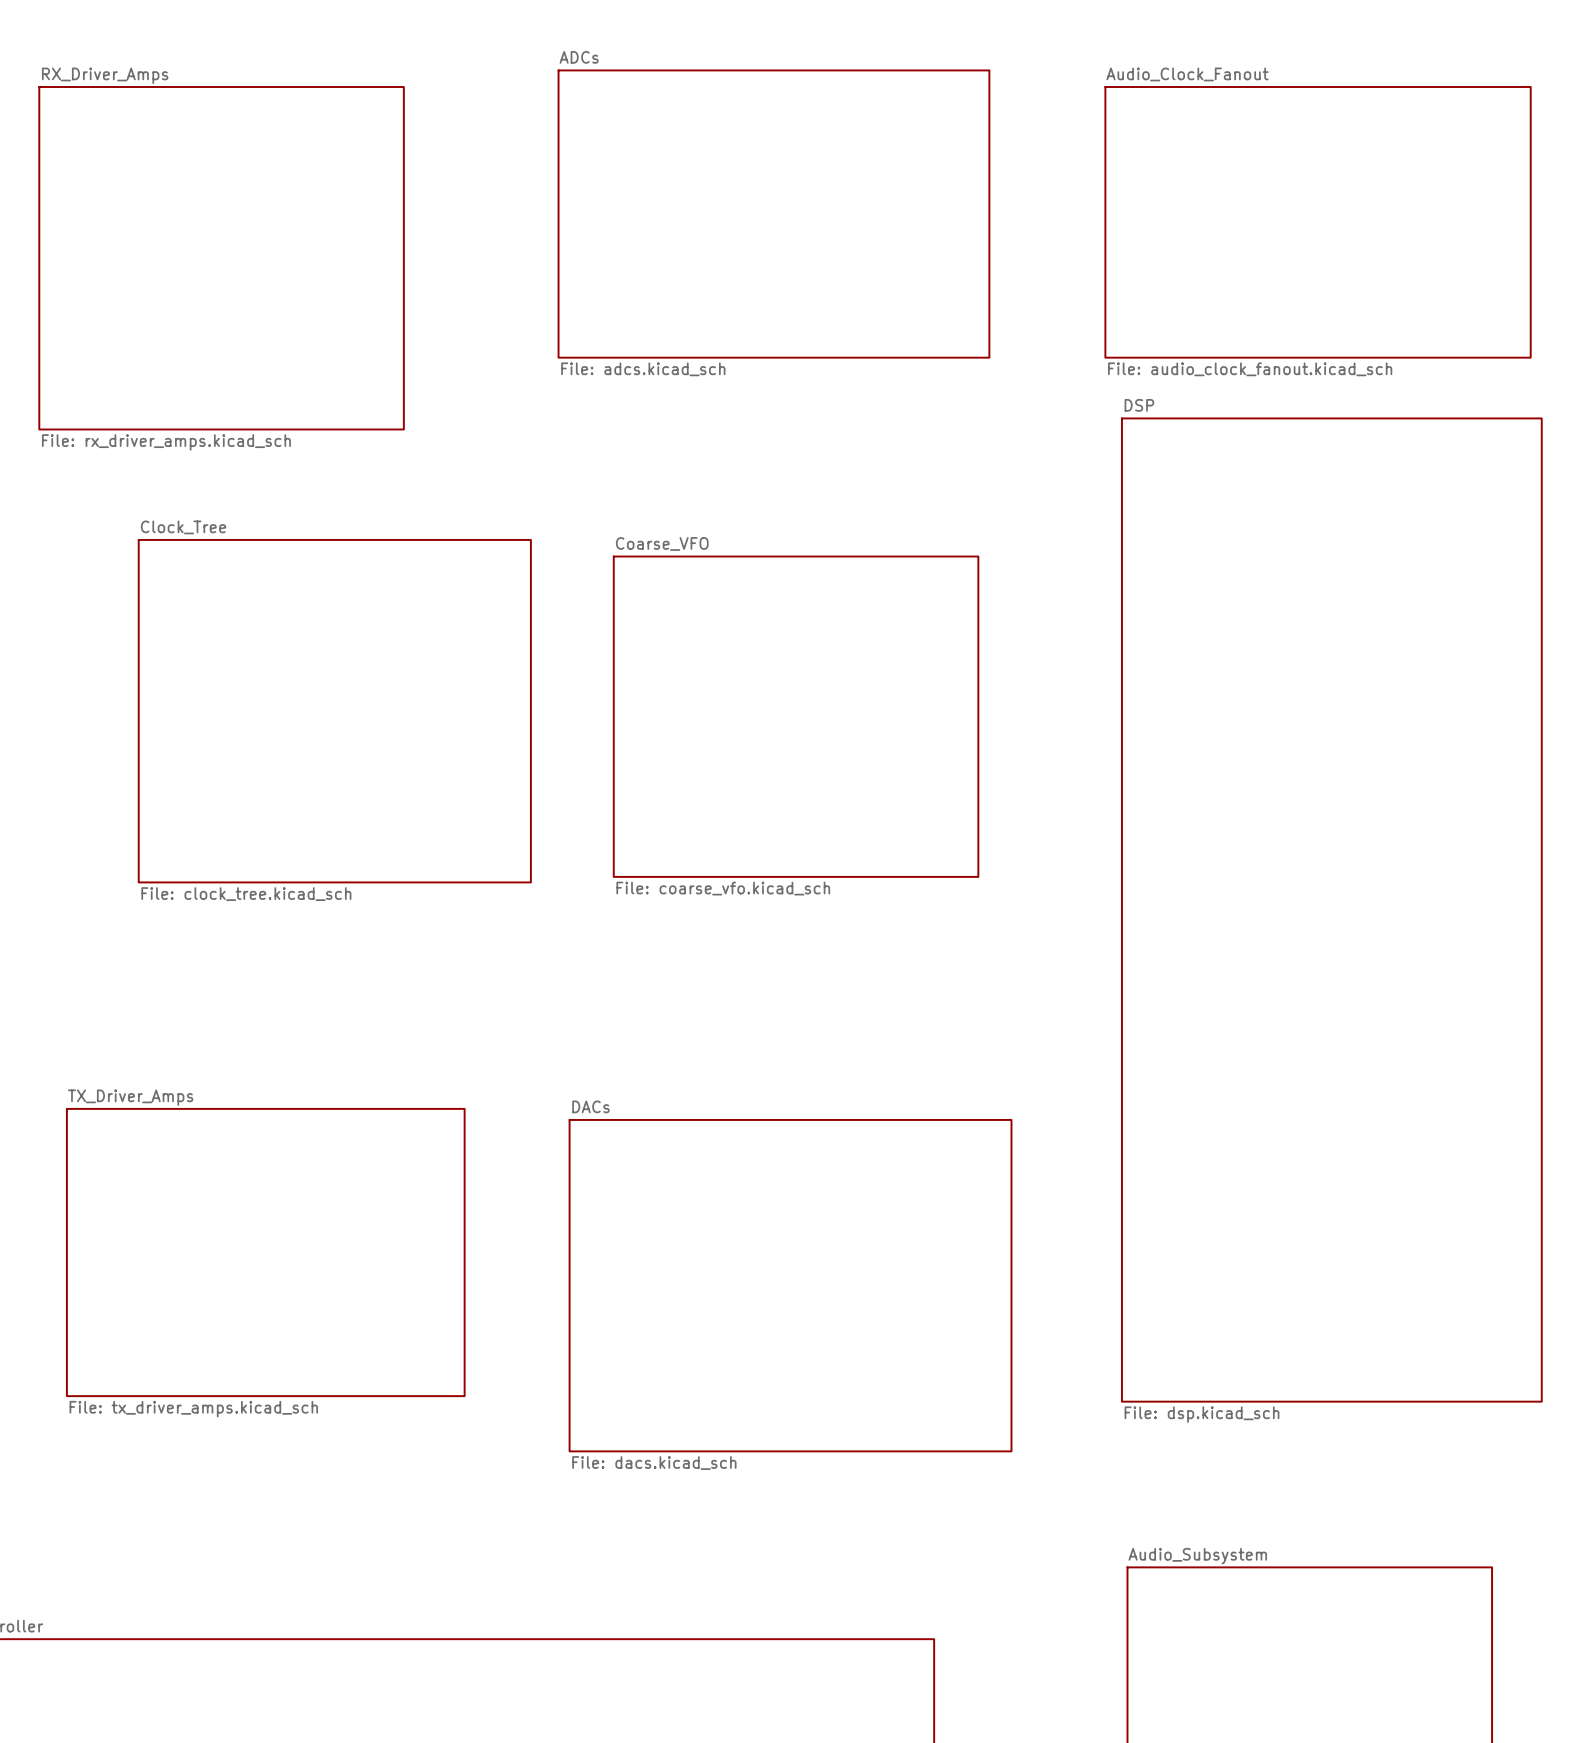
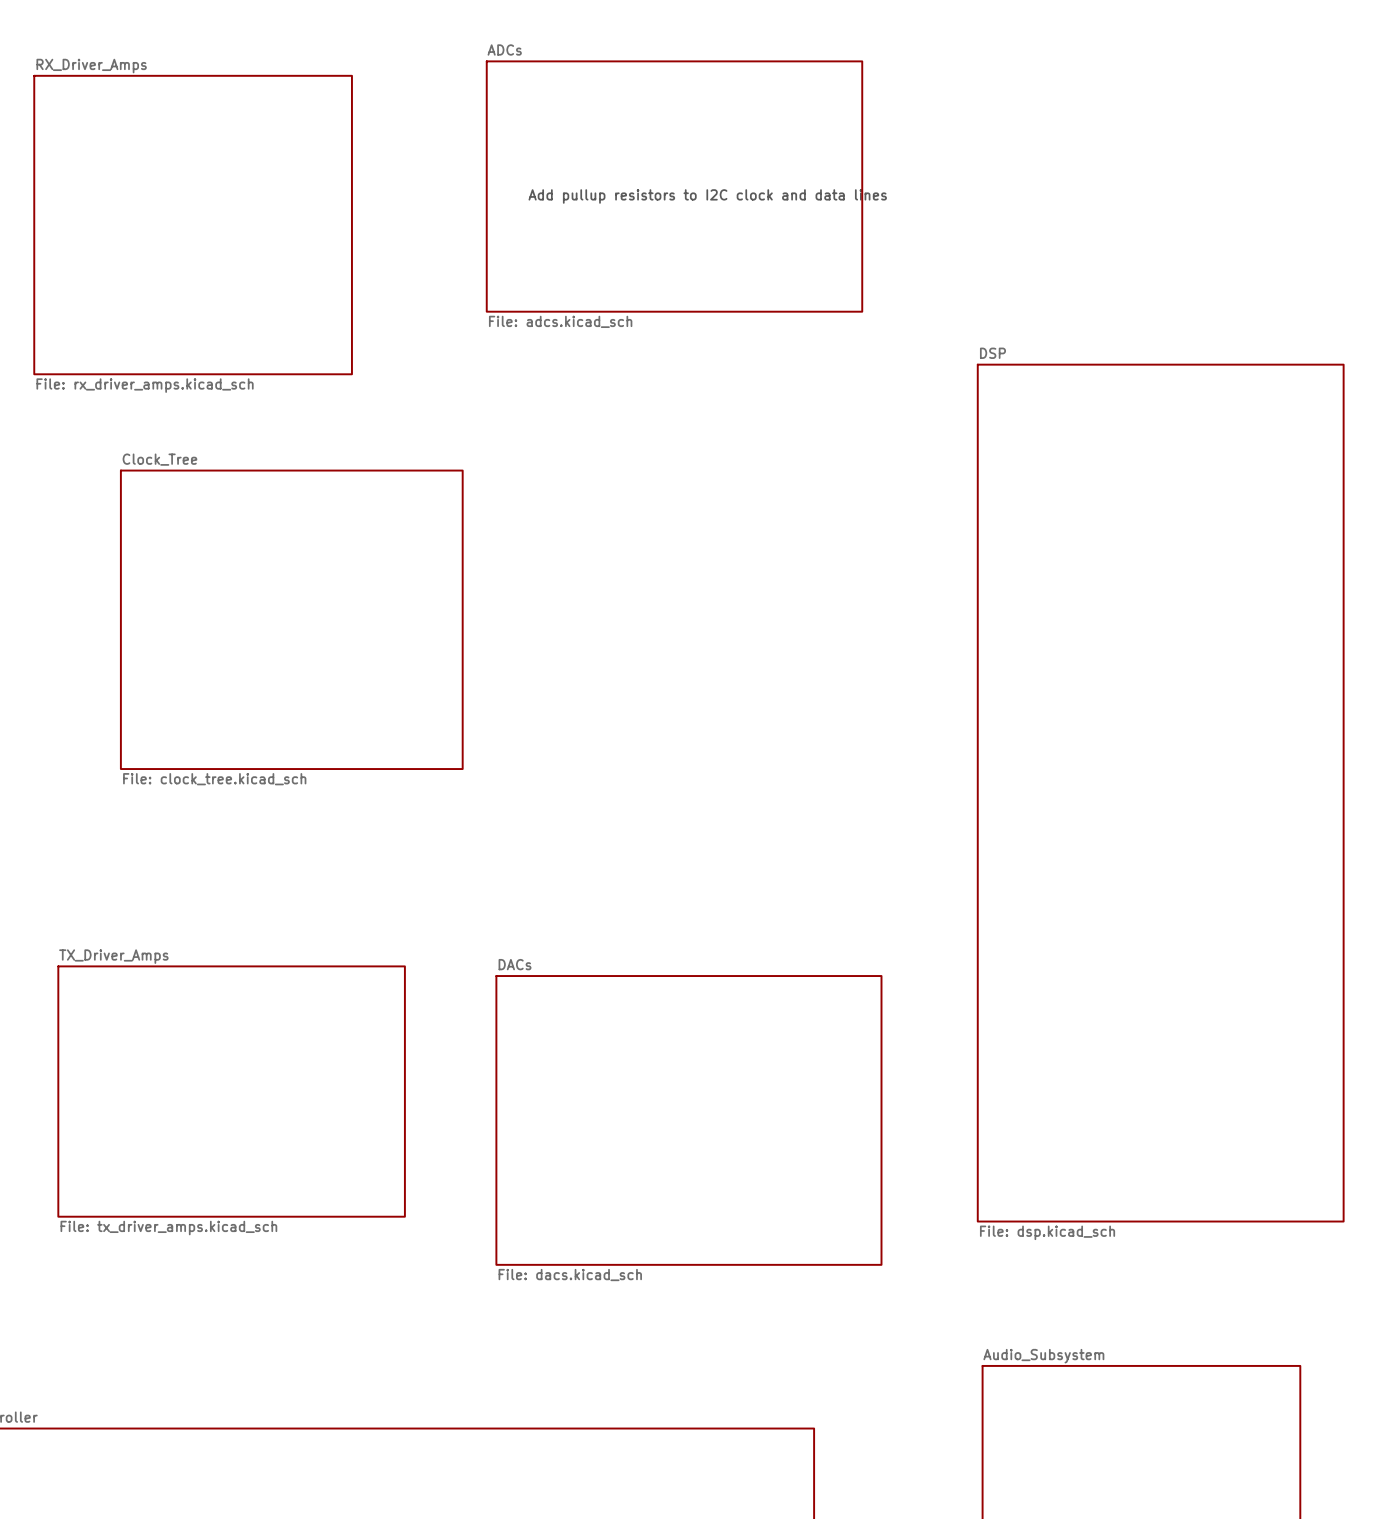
sheet Audio_Clock_Fanout: File: audio_clock_fanout.kicad_sch (1318, 222) -> none
text: none -> Add pullup resistors to I2C clock and data lines (707, 196)
sheet Coarse_VFO: File: coarse_vfo.kicad_sch (796, 716) -> none

